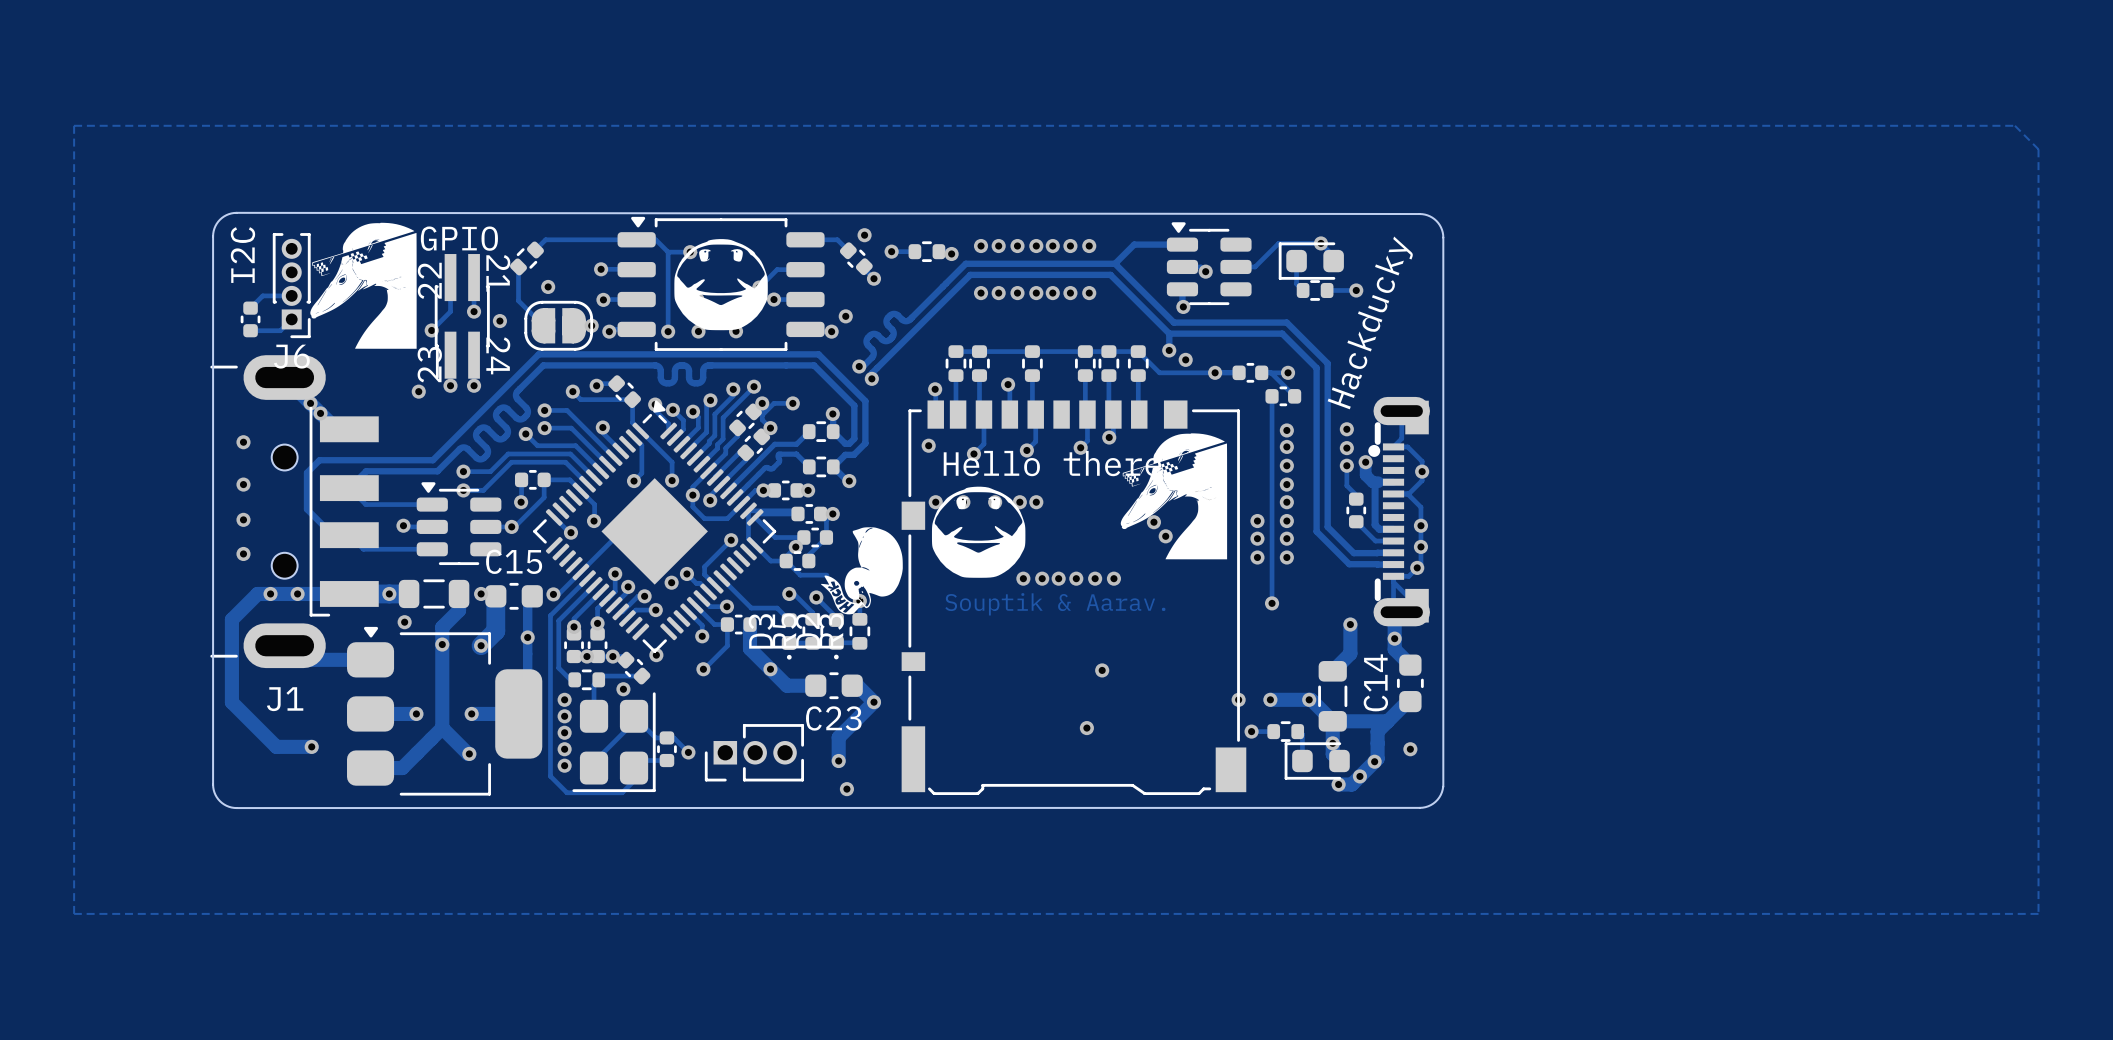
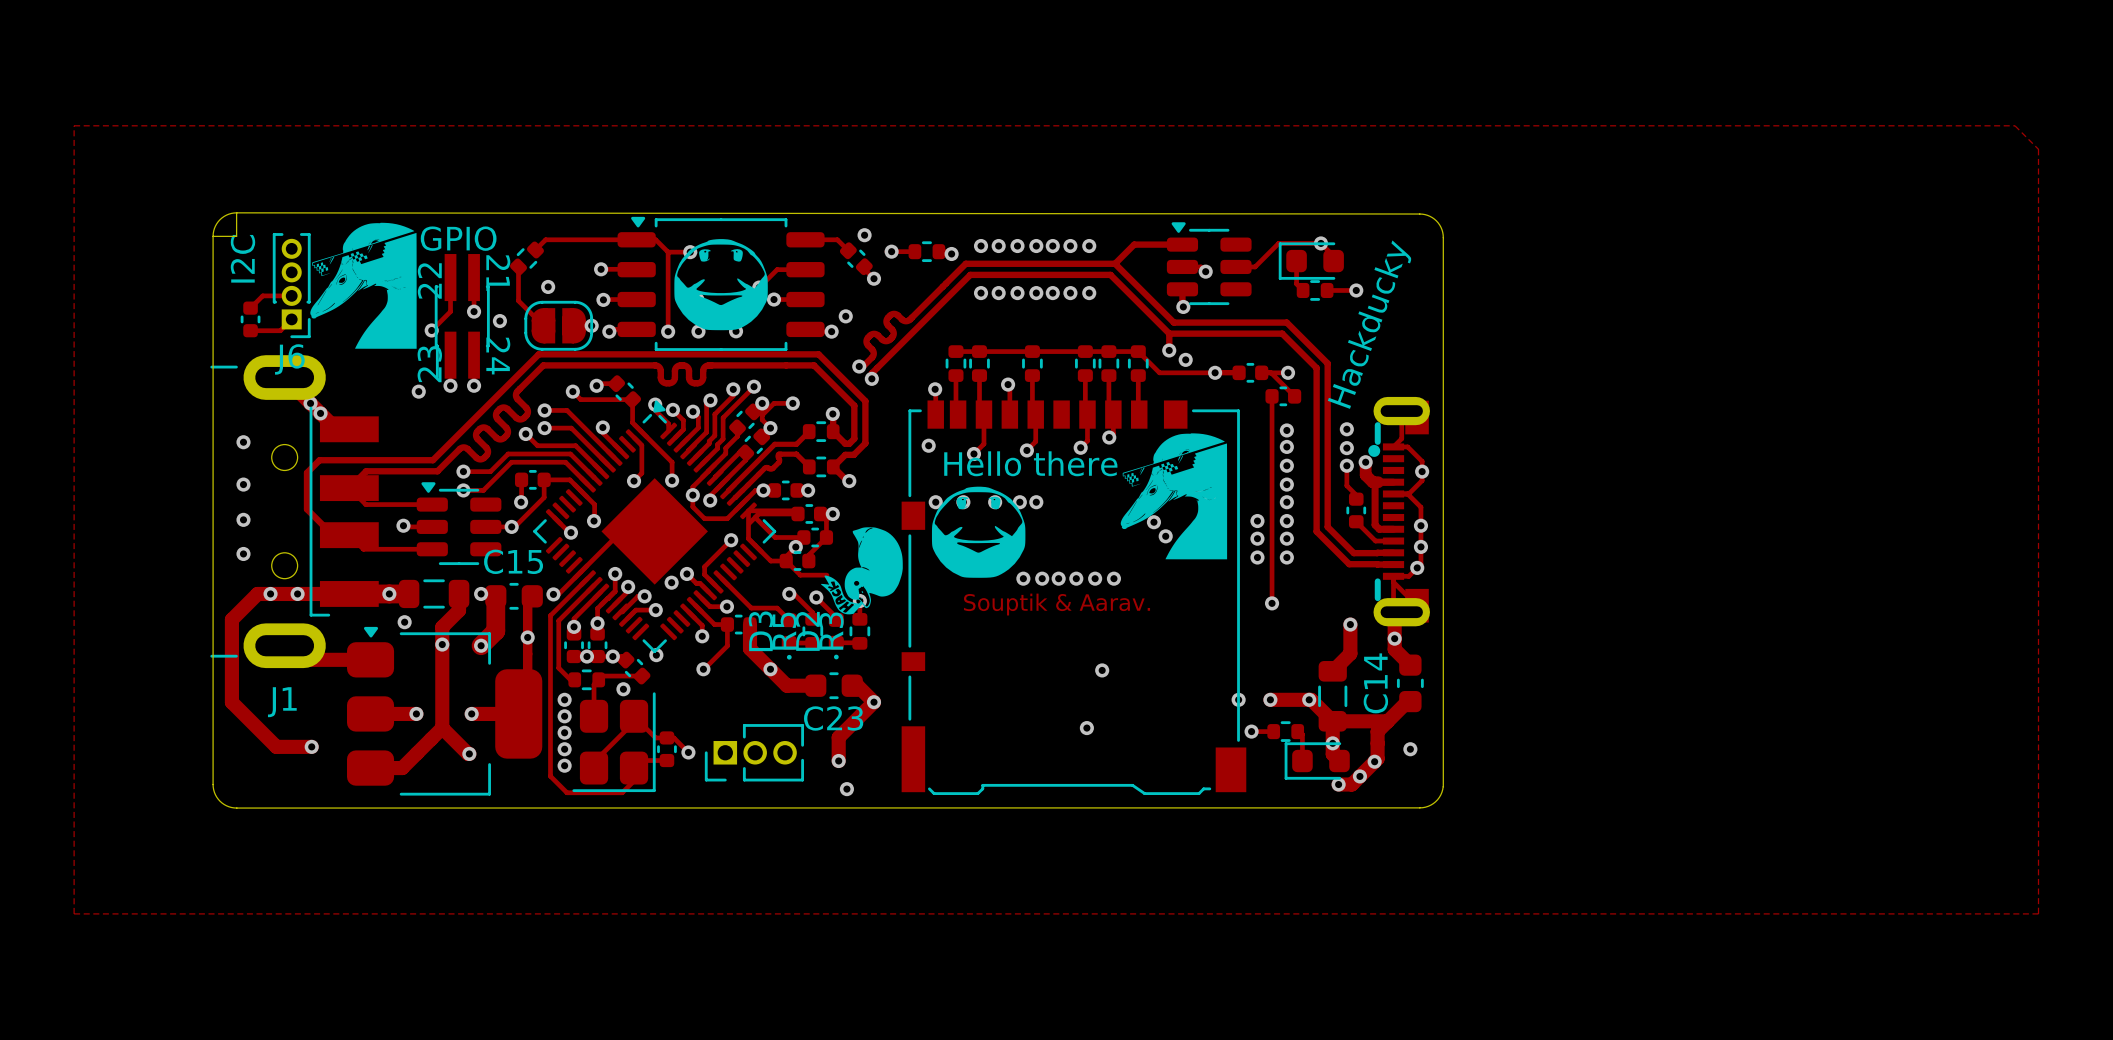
board edge: none -> (236, 212) (236, 236) (213, 236)

